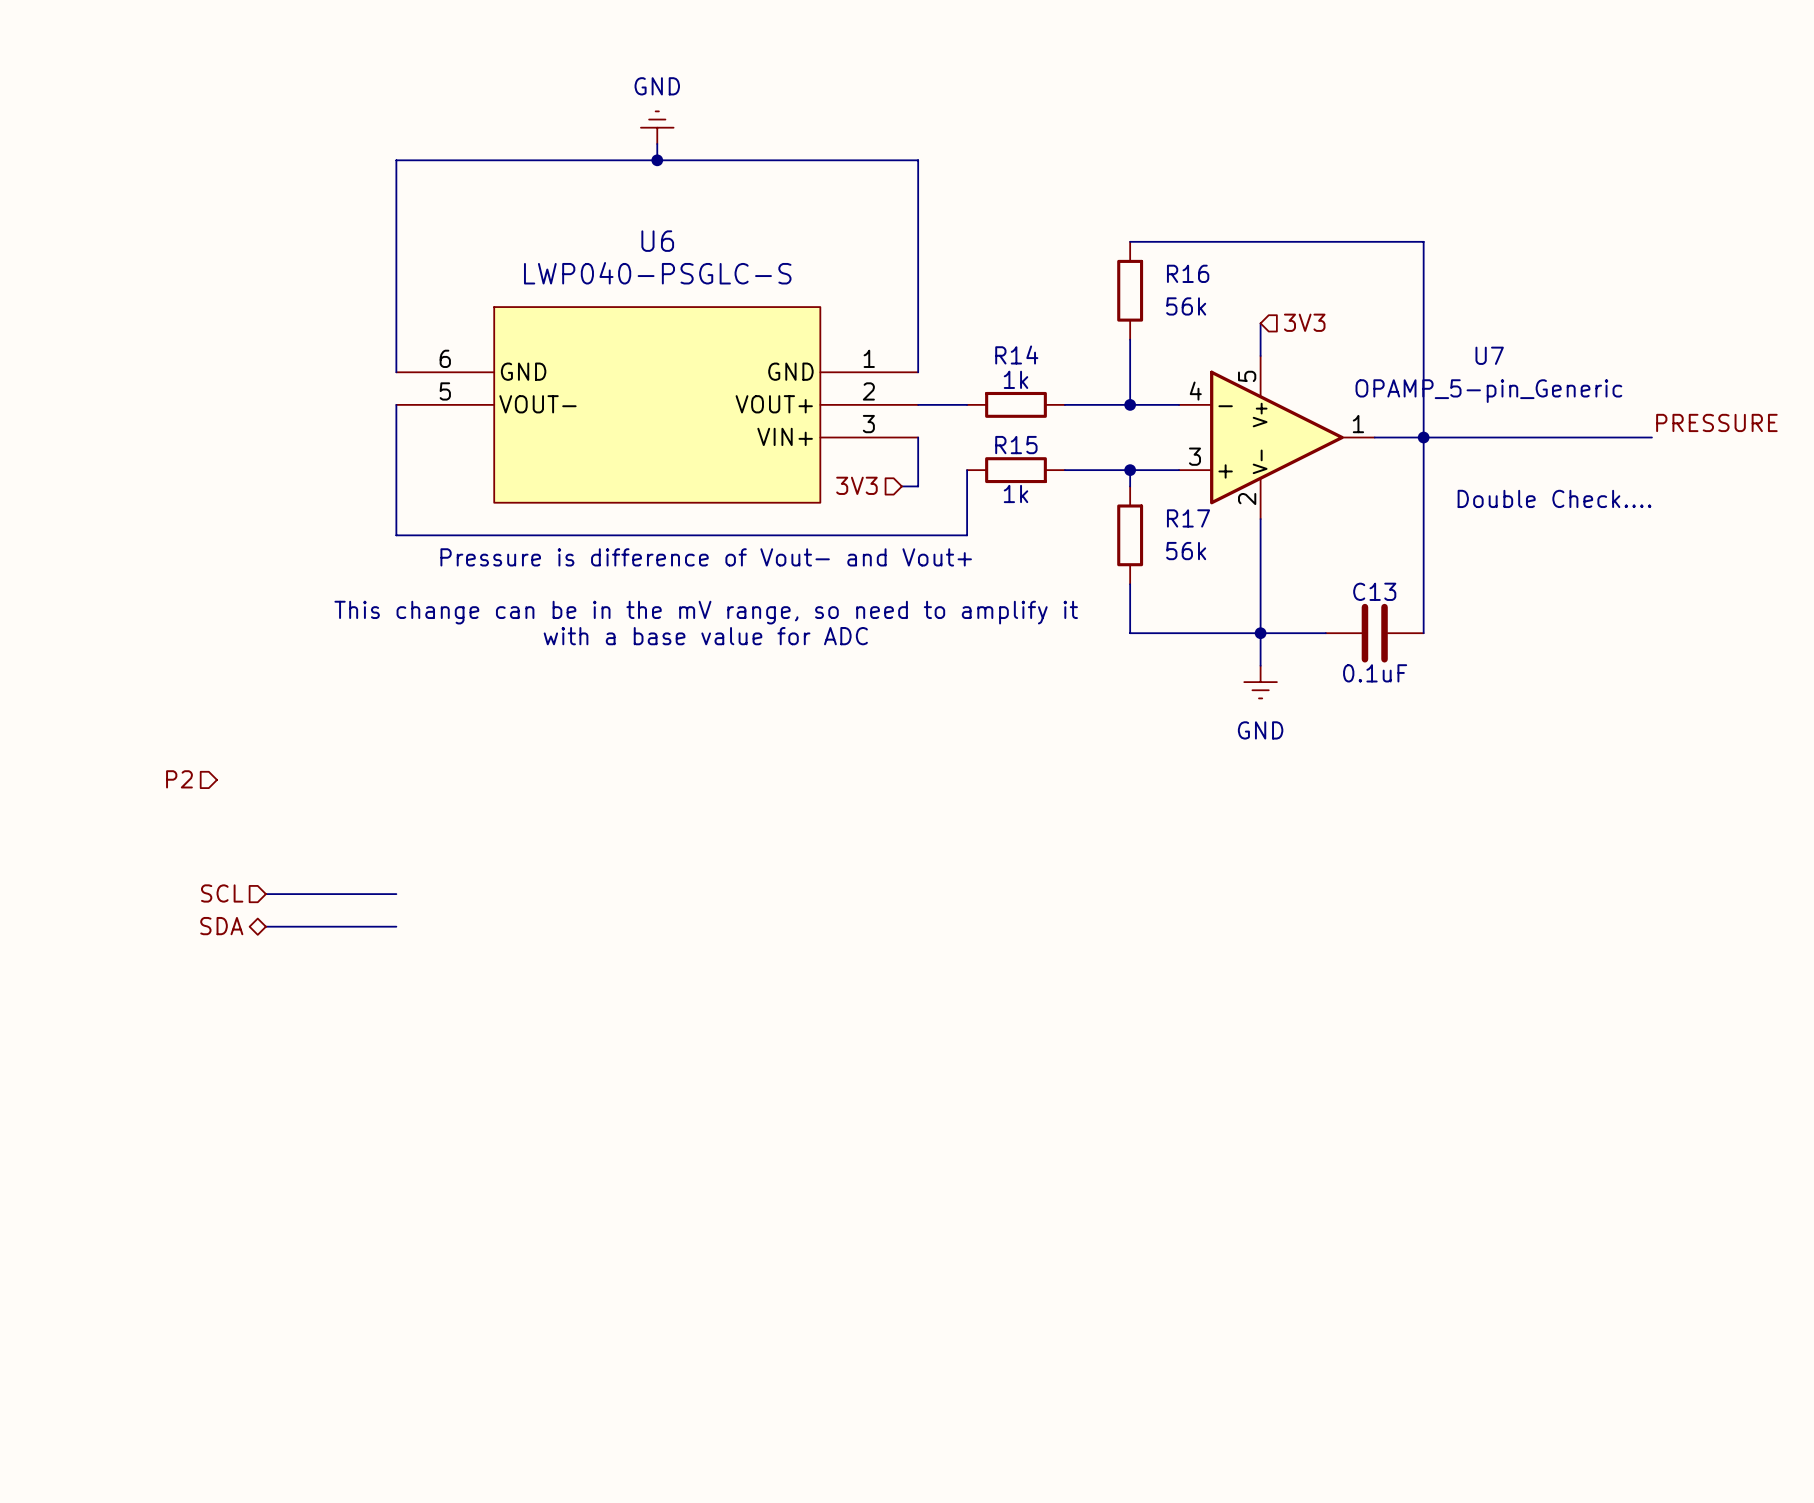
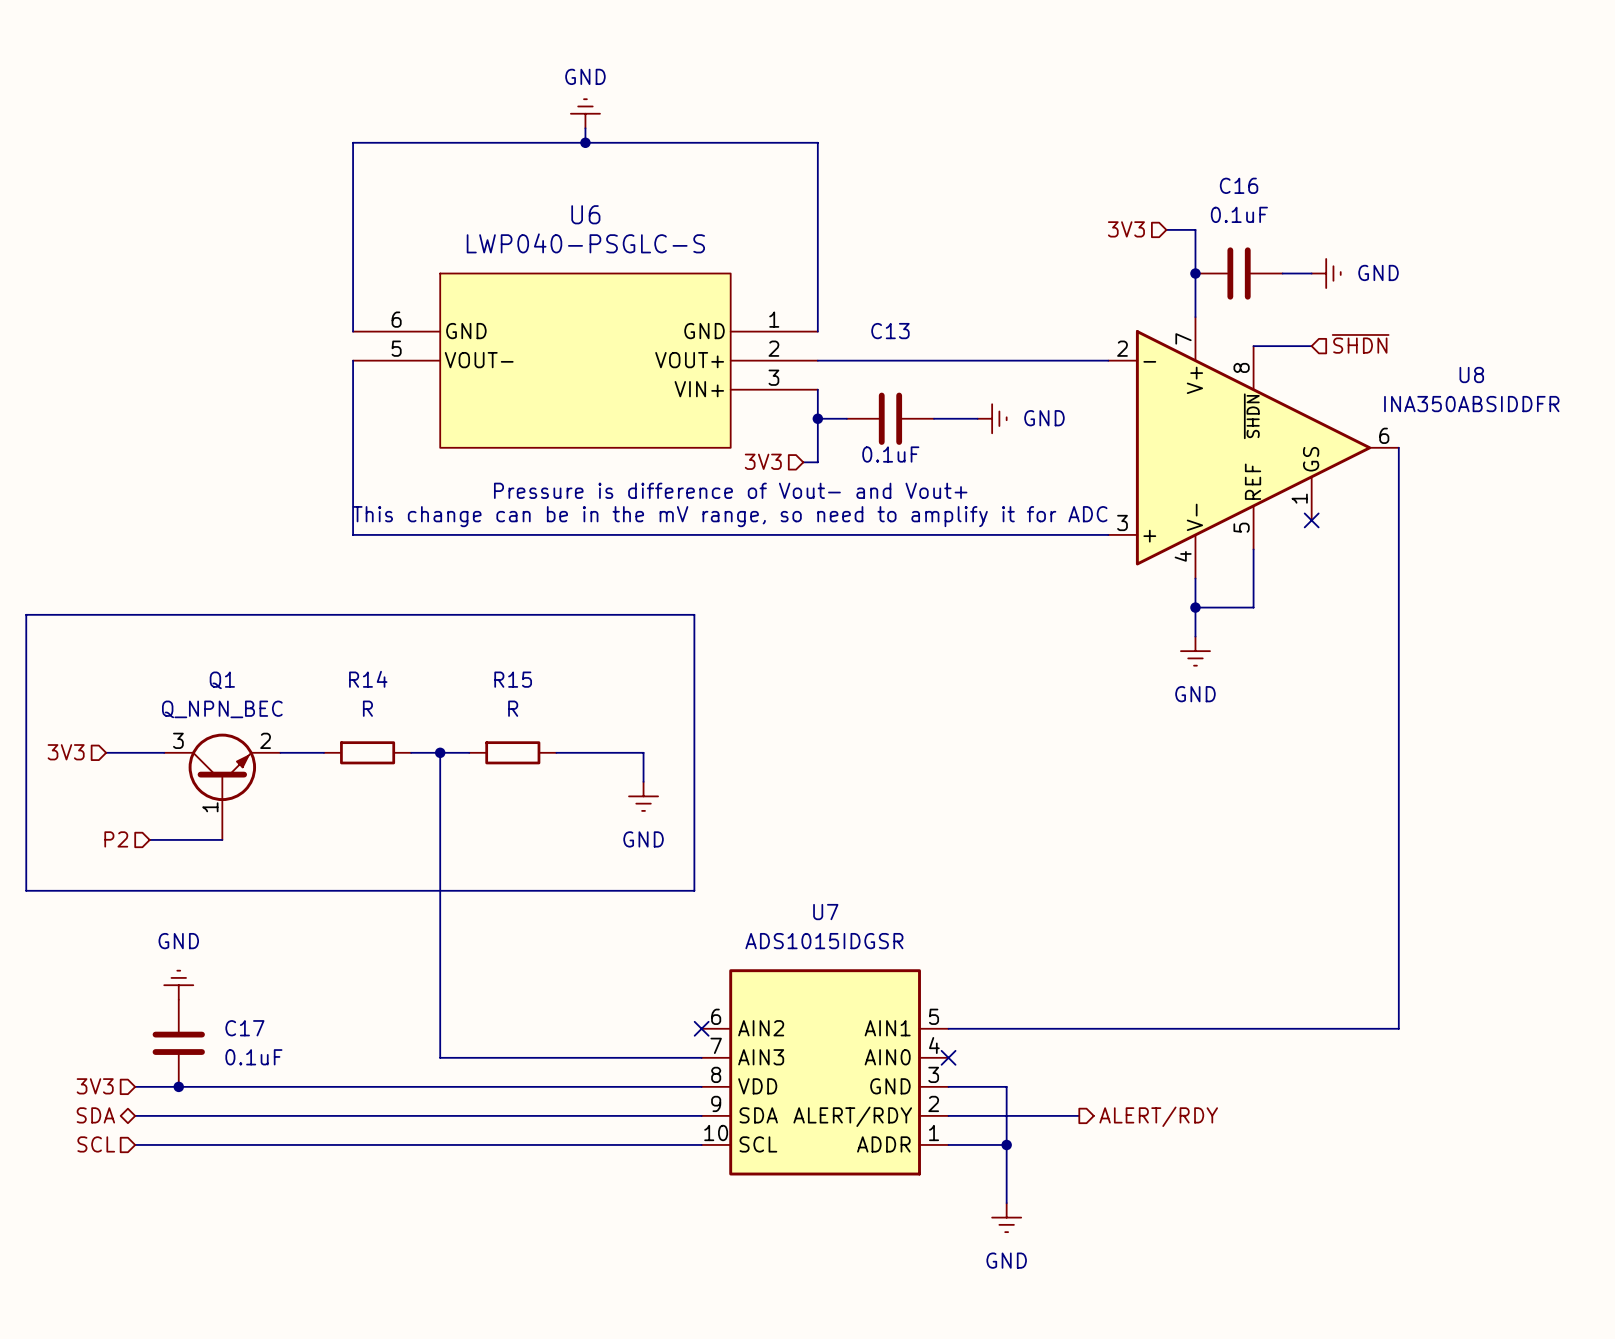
wire: (1130, 241) (1423, 241) (1423, 633) -> none
wire: none -> (1166, 229) (1195, 229) (1195, 317)
R16: 56k (1130, 290) -> none
junction: none -> (1195, 273)
C16: none -> 0.1uF (1239, 273)
wire: none -> (1282, 273) (1311, 273)
power symbol: none -> GND (1326, 273)
hierarchical label rotation: 0° (1304, 322) -> 180° (1126, 229)
hierarchical label position: 3V3 (1304, 322) -> 3V3 (1126, 229)
wire: (1260, 323) (1260, 355) -> none
wire: (1130, 339) (1130, 404) -> none
R14 name position: R14 (1016, 354) -> R14 (368, 679)
U7 symbol: [1179, 355, 1375, 520] -> [701, 969, 949, 1176]
U7 name position: U7 (1489, 355) -> U7 (825, 912)
R14 value: 1k (1016, 379) -> R (367, 708)
hierarchical label: none -> ~{SHDN} (1360, 343)
wire: none -> (1253, 346) (1311, 346)
U7 value: OPAMP_5-pin_Generic (1488, 391) -> ADS1015IDGSR (824, 941)
wire: none -> (861, 360) (948, 360)
R14 position: (1016, 404) -> (367, 752)
junction: (1130, 404) -> none
label: PRESSURE (1716, 422) -> none
wire: (1374, 437) (1651, 437) -> none
junction: (1423, 437) -> none
R15 name position: R15 (1016, 445) -> R15 (513, 679)
wire: none -> (817, 418) (846, 418)
junction: none -> (817, 418)
wire: (967, 470) (967, 535) (396, 535) -> (1108, 534) (353, 534) (353, 476)
R15 position: (1016, 470) -> (512, 752)
wire: (1097, 470) (1179, 470) -> none
power symbol: none -> GND (992, 418)
wire: (1130, 470) (1130, 486) -> none
junction: (1130, 470) -> none
hierarchical label position: 3V3 (856, 485) -> 3V3 (763, 461)
wire: (901, 486) (918, 486) -> (803, 462) (817, 462) (817, 433)
R15 value: 1k (1016, 493) -> R (513, 708)
text: Double Check.... (1554, 498) -> none
U8: none -> INA350ABSIDDFR (1253, 447)
wire: none -> (1398, 447) (1398, 1028) (948, 1028)
wire: (1260, 519) (1260, 665) -> none
R17: 56k (1130, 535) -> none
text position: Pressure is difference of Vout- and Vout+ (706, 557) -> Pressure is difference of Vout- and Vout+ (730, 490)
wire: (1130, 584) (1130, 633) (1325, 633) -> none
no-connect mark: none -> (1311, 520)
C13 name position: C13 (1374, 591) -> C13 (890, 331)
text: This change can be in the mV range, so need to amplify it (706, 612) -> This change can be in the mV range, so need to amplify it for ADC (730, 516)
wire: none -> (1253, 549) (1253, 607) (1195, 607)
junction: (1260, 633) -> none
C13 position: (1374, 633) -> (890, 418)
text: with a base value for ADC (705, 636) -> none
wire: none -> (1195, 578) (1195, 636)
power symbol position: GND (1260, 682) -> GND (1195, 651)
junction: none -> (1195, 607)
line: none -> (26, 614) (694, 614) (694, 890) (26, 890) (26, 614)
hierarchical label position: P2 (179, 779) -> P2 (116, 839)
hierarchical label: none -> 3V3 (66, 752)
wire: none -> (106, 752) (164, 752)
wire: none -> (280, 752) (324, 752)
wire: none -> (411, 752) (469, 752)
wire: none -> (440, 752) (440, 1057) (701, 1057)
junction: none -> (440, 752)
wire: none -> (556, 752) (643, 752) (643, 781)
Q1: none -> Q_NPN_BEC (222, 786)
hierarchical label: SCL (222, 893) -> none
wire: (265, 894) (396, 894) -> none
power symbol: none -> GND (643, 796)
hierarchical label: SDA (221, 926) -> none
wire: (265, 926) (396, 926) -> none
wire: none -> (149, 839) (222, 839)
power symbol: none -> GND (178, 985)
no-connect mark: none -> (701, 1028)
C17: none -> 0.1uF (178, 1043)
no-connect mark: none -> (948, 1057)
hierarchical label: none -> 3V3 (95, 1086)
wire: none -> (135, 1086) (701, 1086)
junction: none -> (178, 1086)
wire: none -> (948, 1086) (1006, 1086) (1006, 1203)
hierarchical label: none -> SDA (95, 1115)
wire: none -> (135, 1115) (701, 1115)
wire: none -> (948, 1115) (1079, 1115)
hierarchical label: none -> ALERT/RDY (1158, 1116)
hierarchical label: none -> SCL (96, 1144)
wire: none -> (135, 1144) (701, 1144)
wire: none -> (948, 1144) (1006, 1144)
junction: none -> (1006, 1144)
power symbol: none -> GND (1006, 1217)

